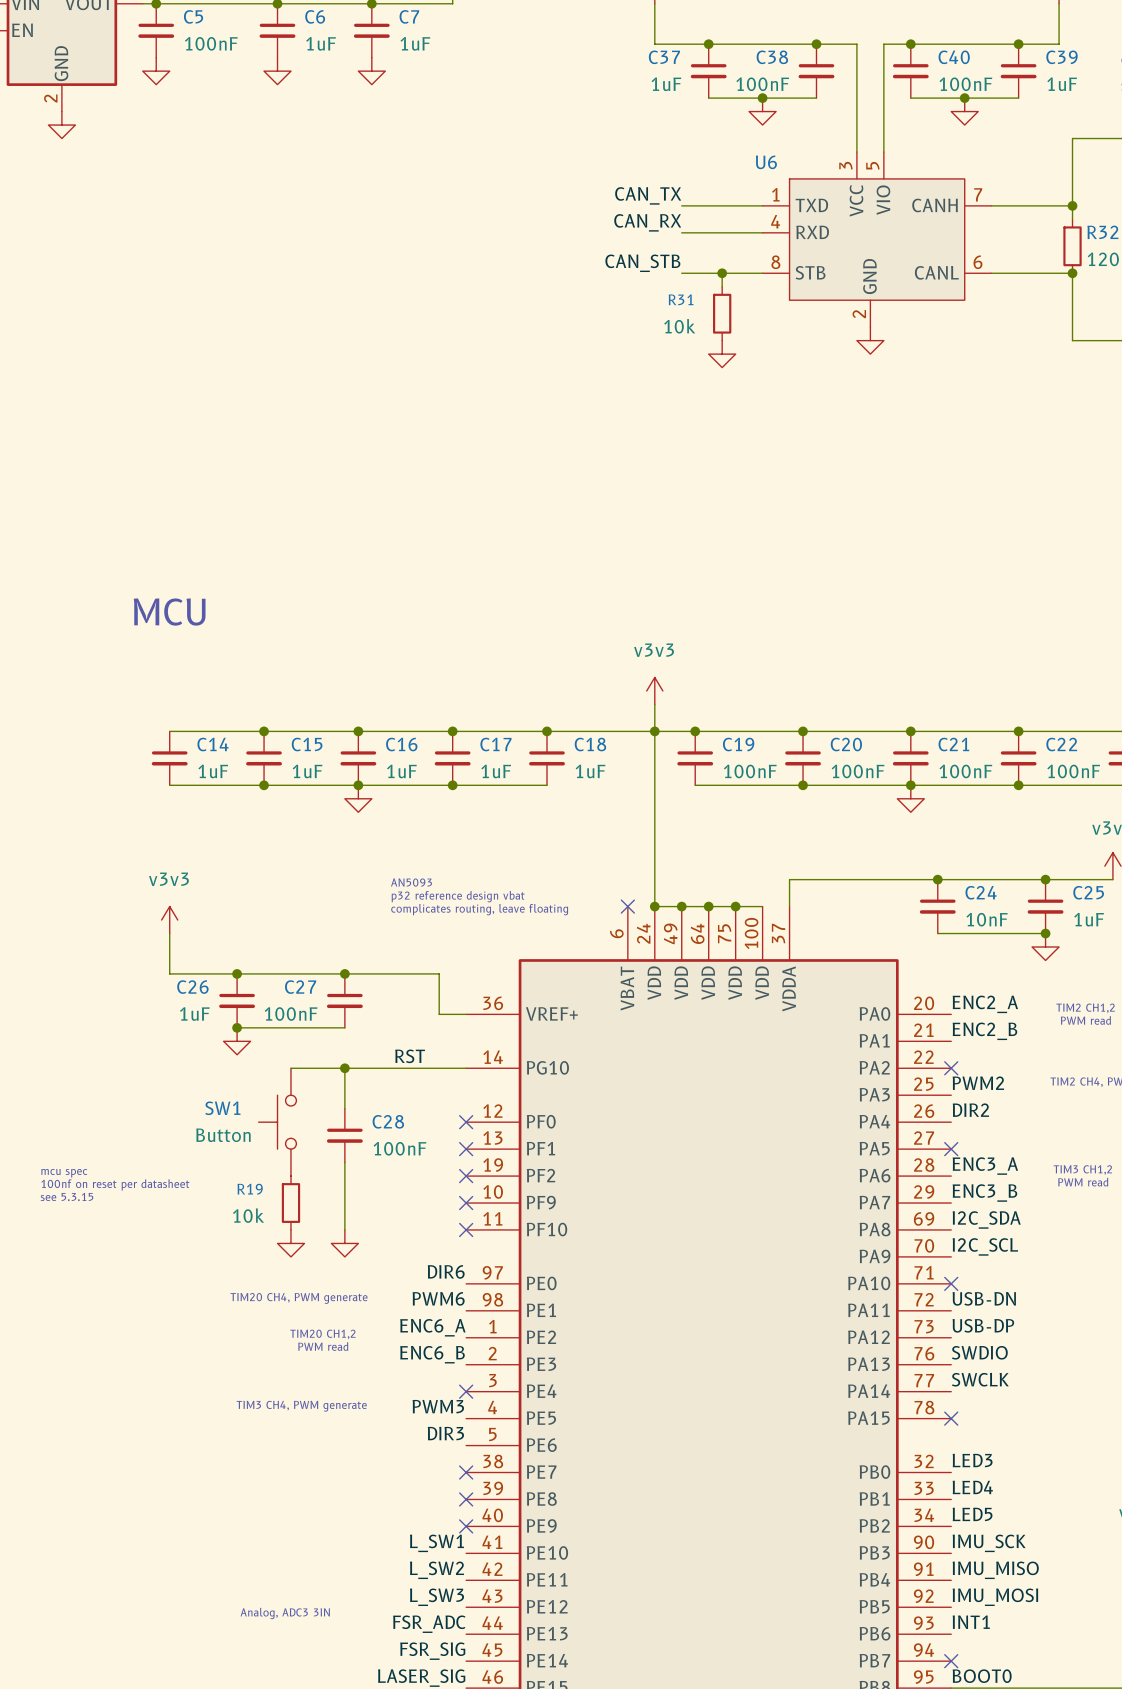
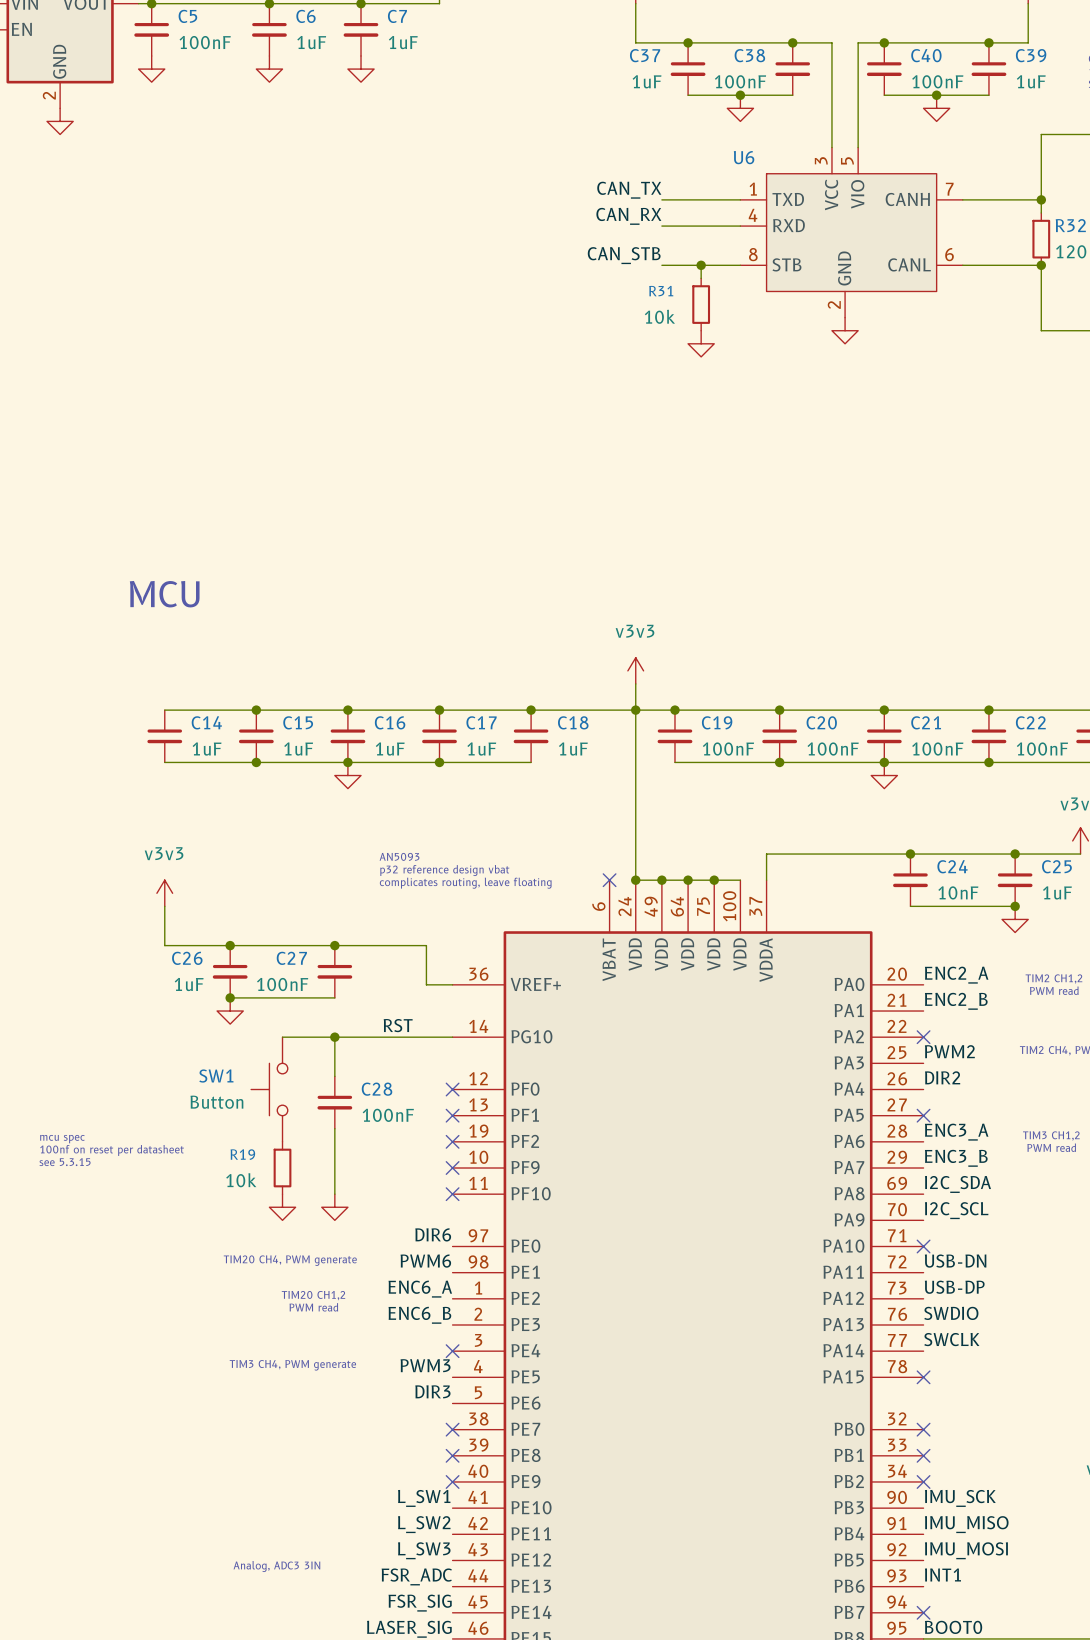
label: LED3 (972, 1460) -> none
no-connect mark: none -> (923, 1429)
label: LED4 (972, 1487) -> none
no-connect mark: none -> (923, 1455)
label: LED5 (972, 1514) -> none
no-connect mark: none -> (923, 1481)

